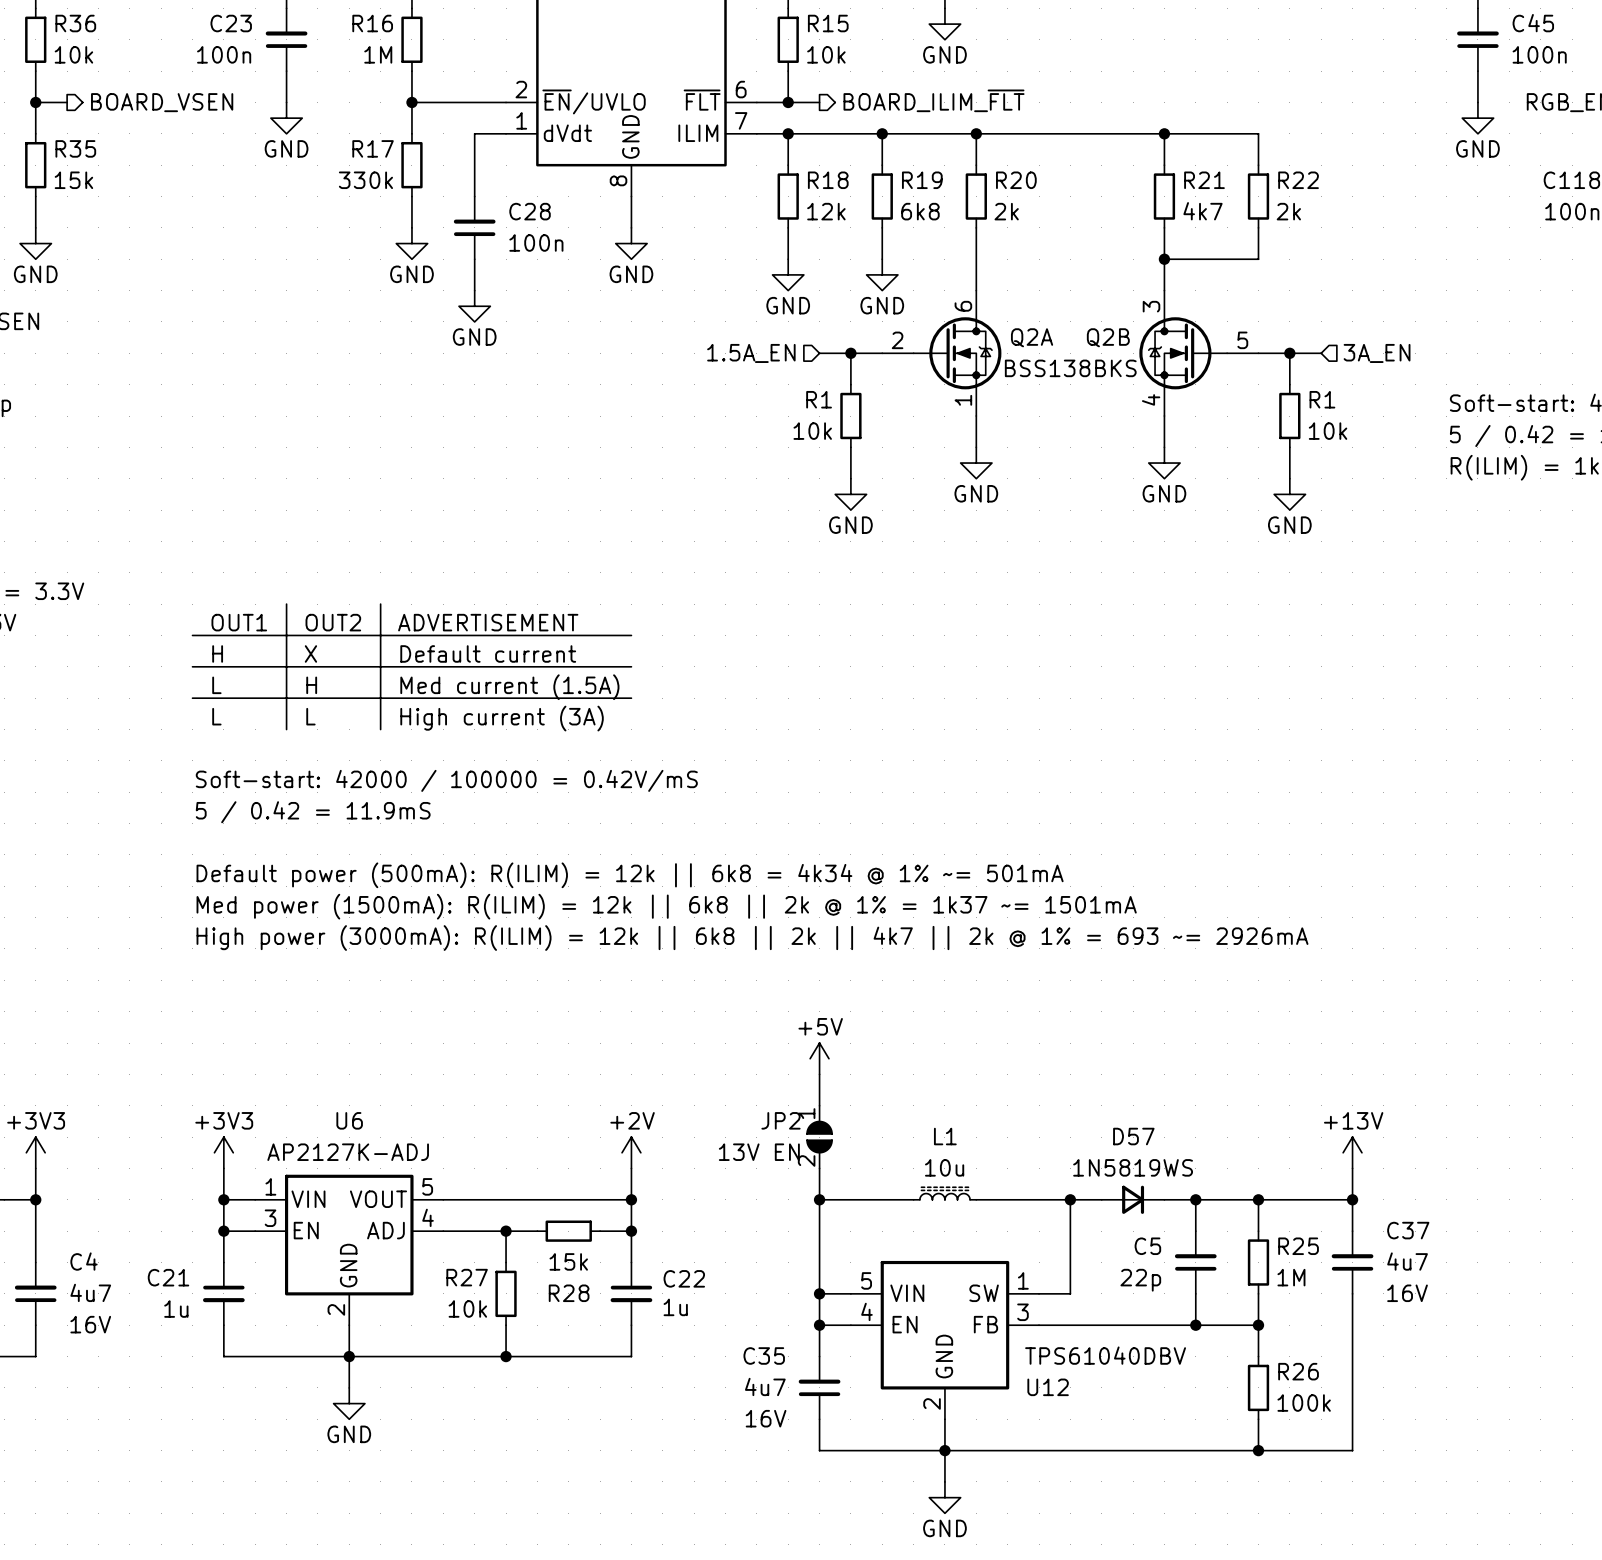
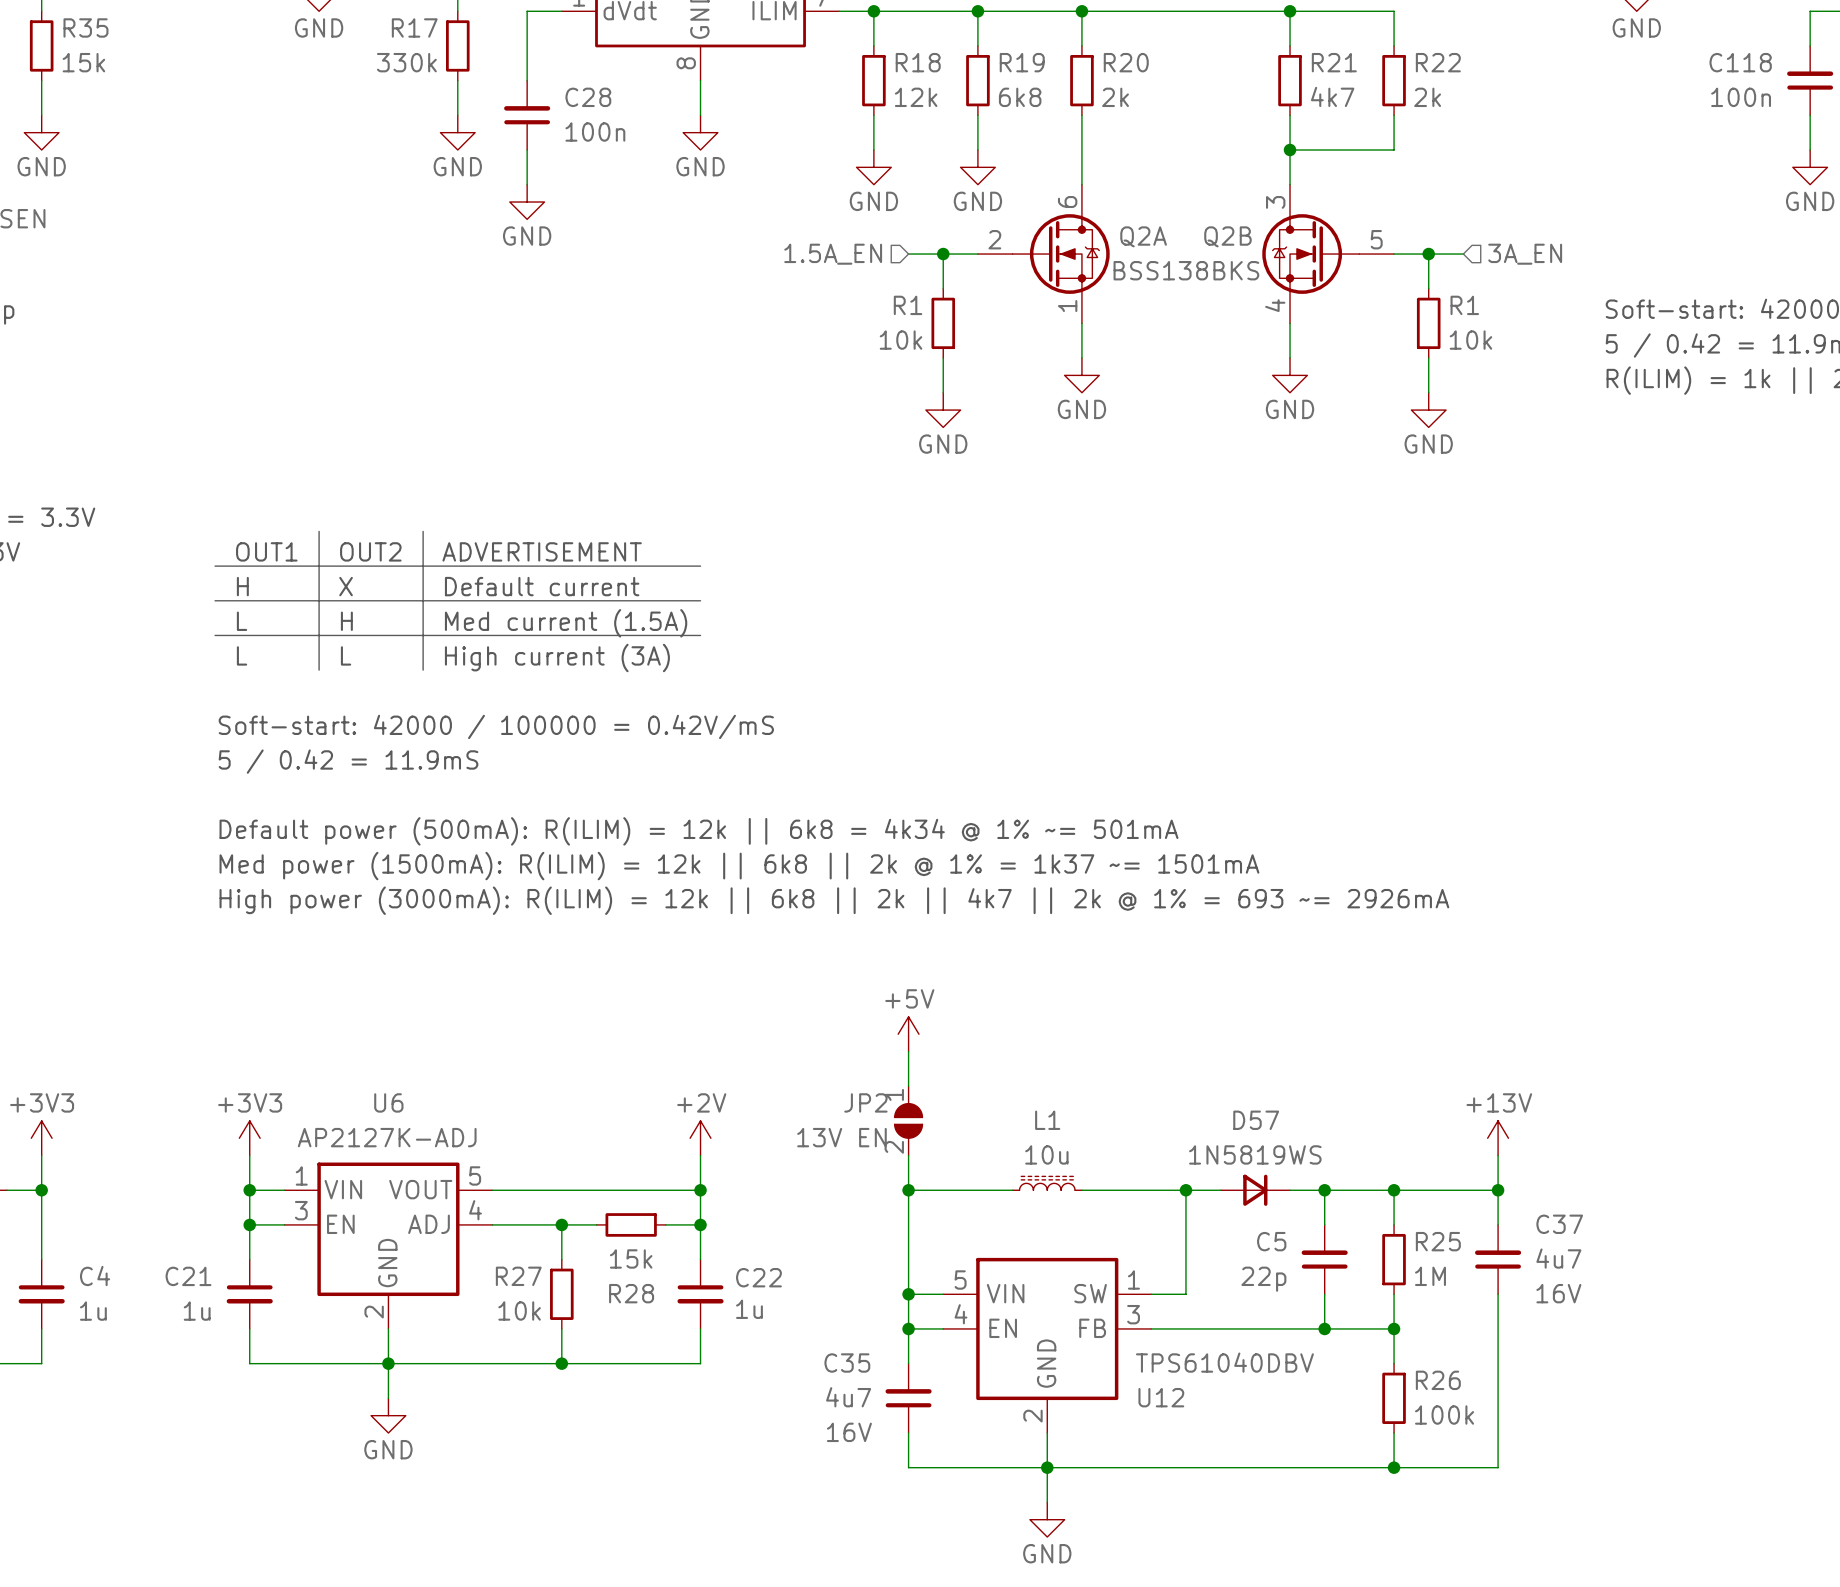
C4 value: 4u7 (90, 1292) -> 1u (93, 1311)
C4 rotation: 0° (35, 1293) -> 180° (41, 1294)
C4 text: 16V (90, 1324) -> none

